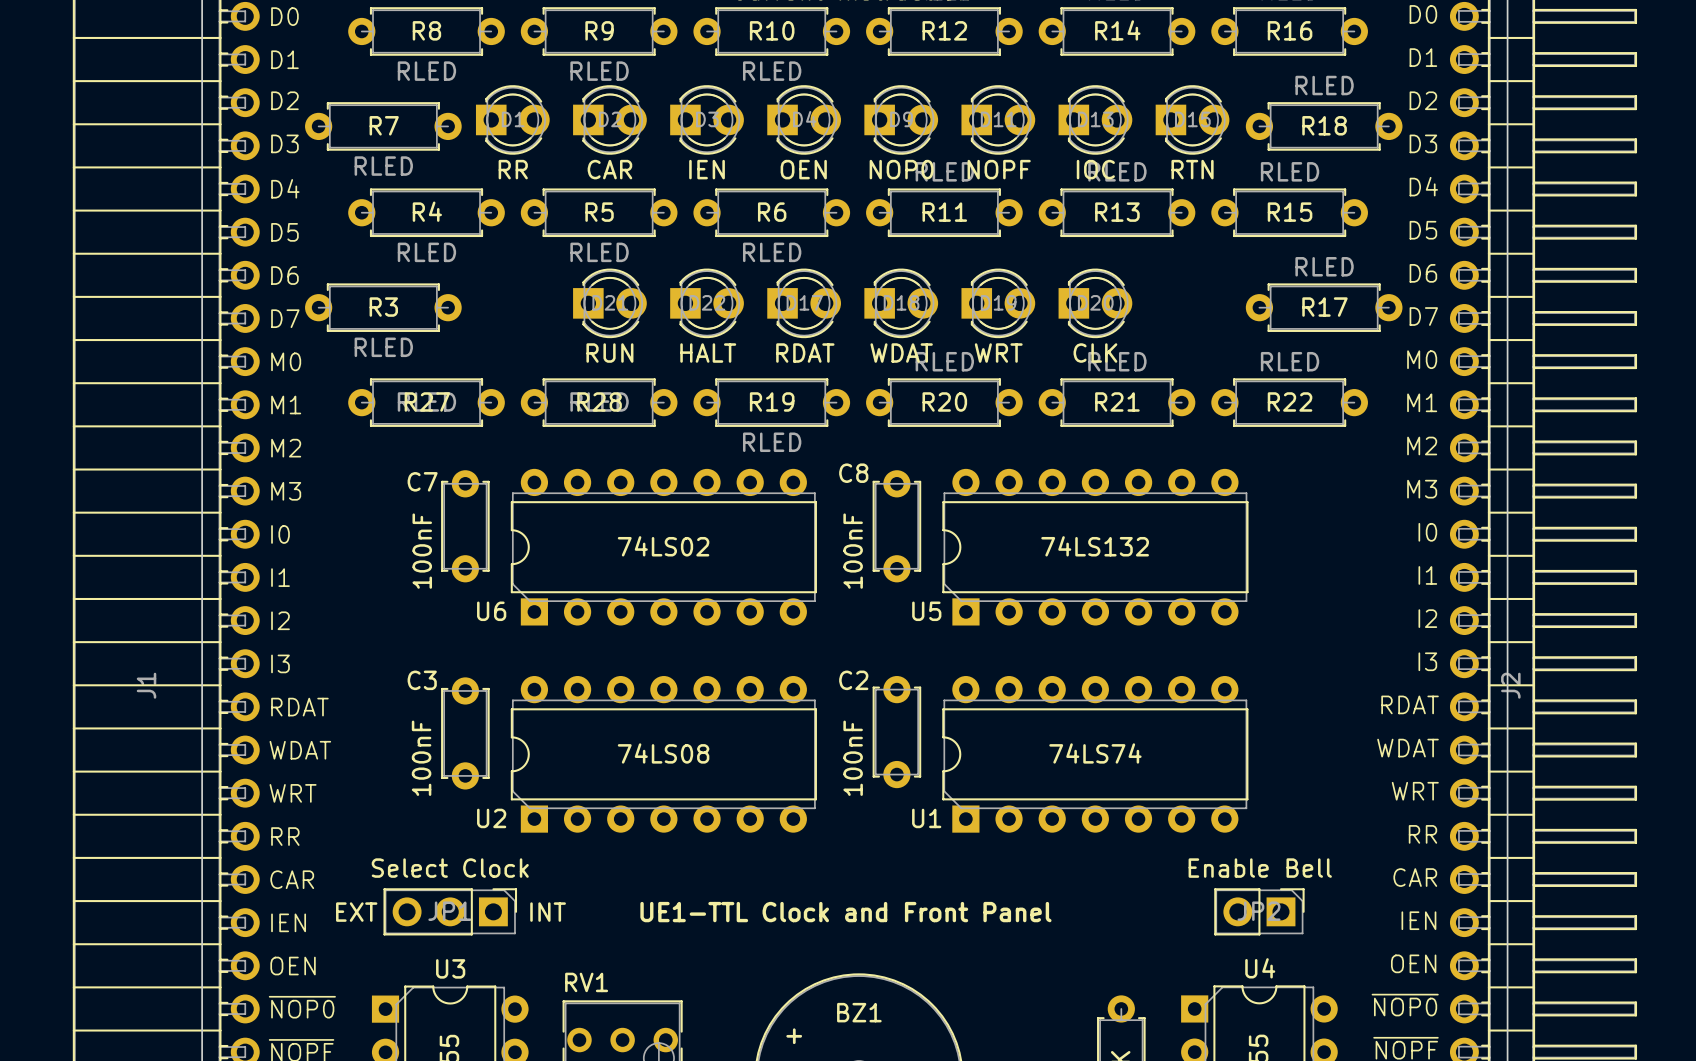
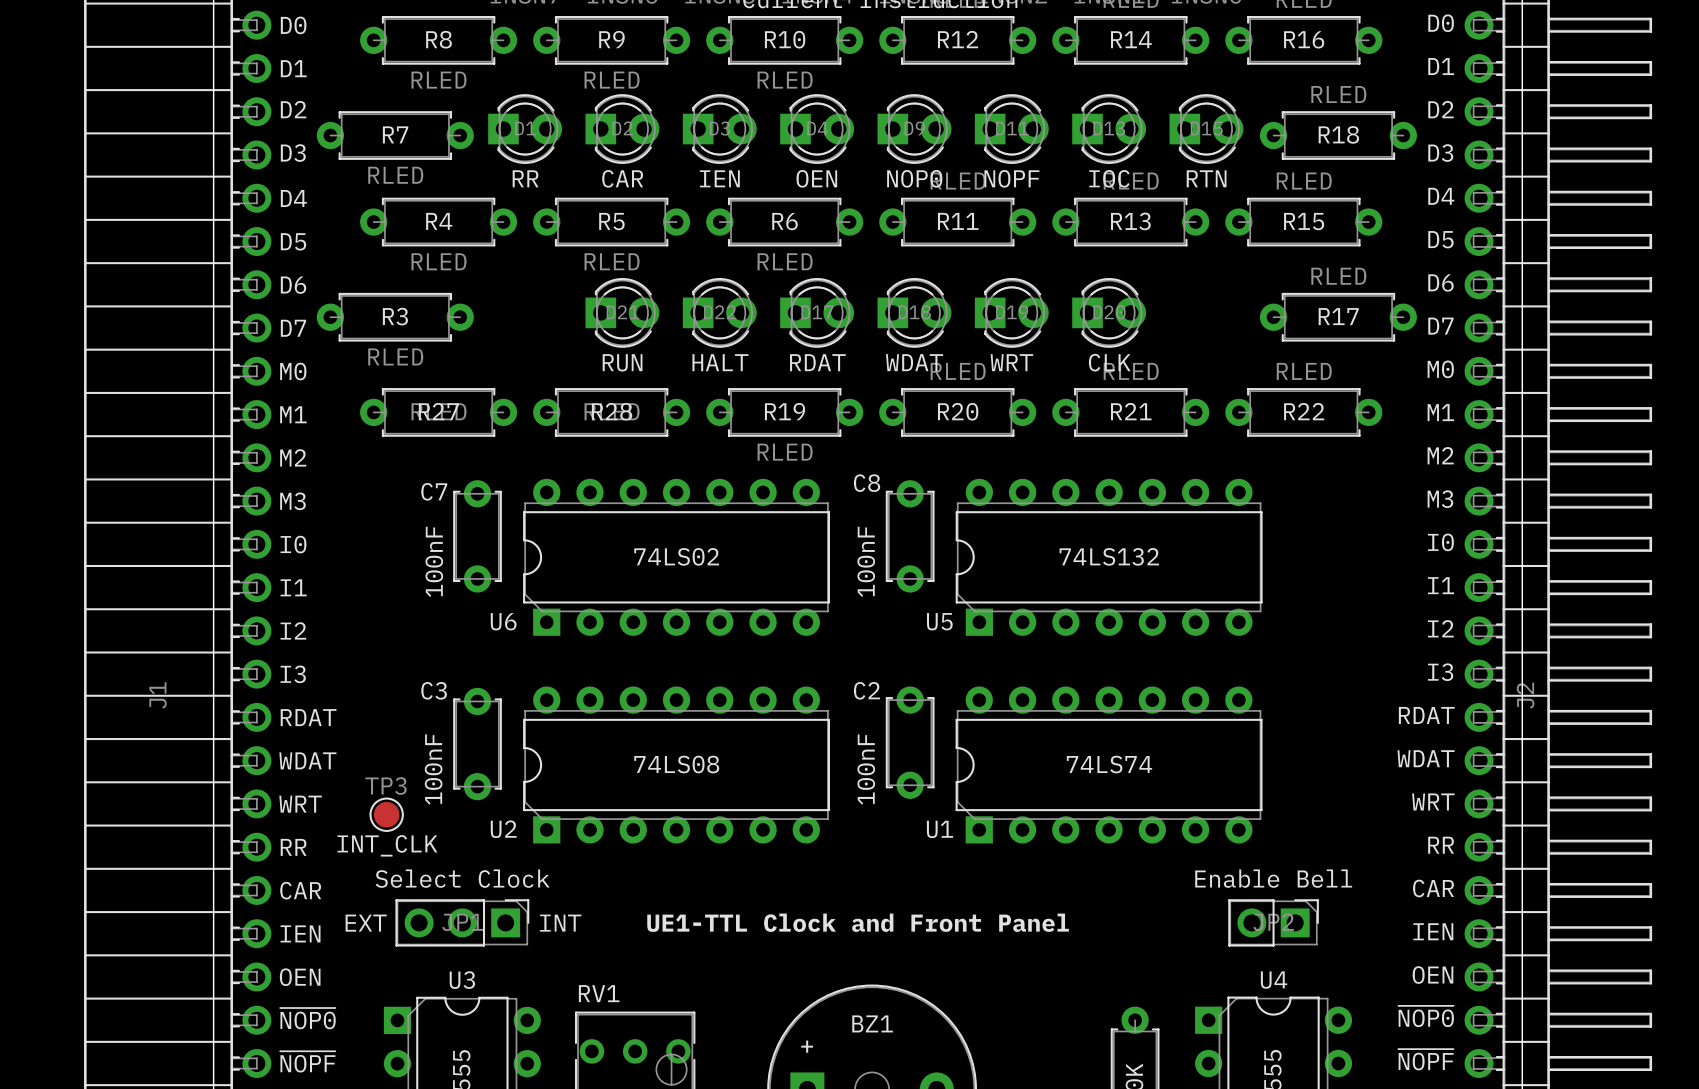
TP3: none -> INT_CLK (386, 814)

